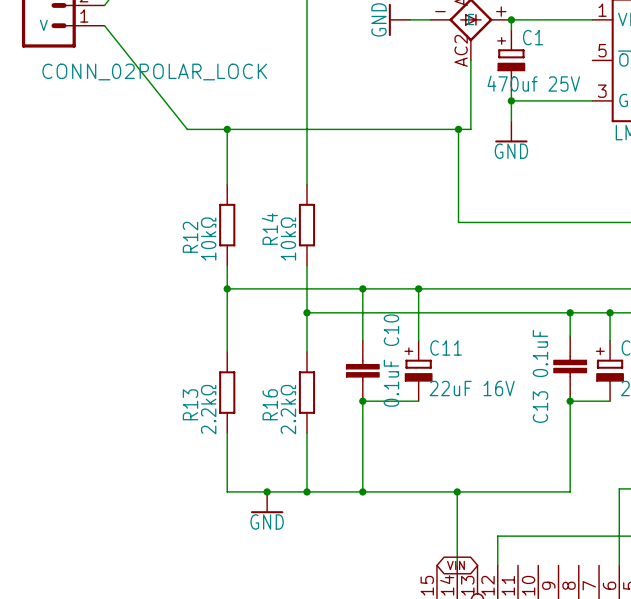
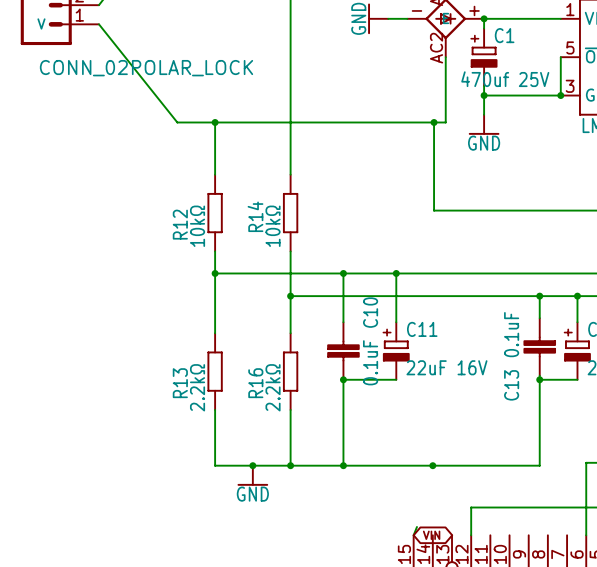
wire: none -> (560, 57) (560, 95)
junction: none -> (560, 95)
wire: (457, 491) (457, 565) -> none
wire: none -> (416, 526) (413, 535)

